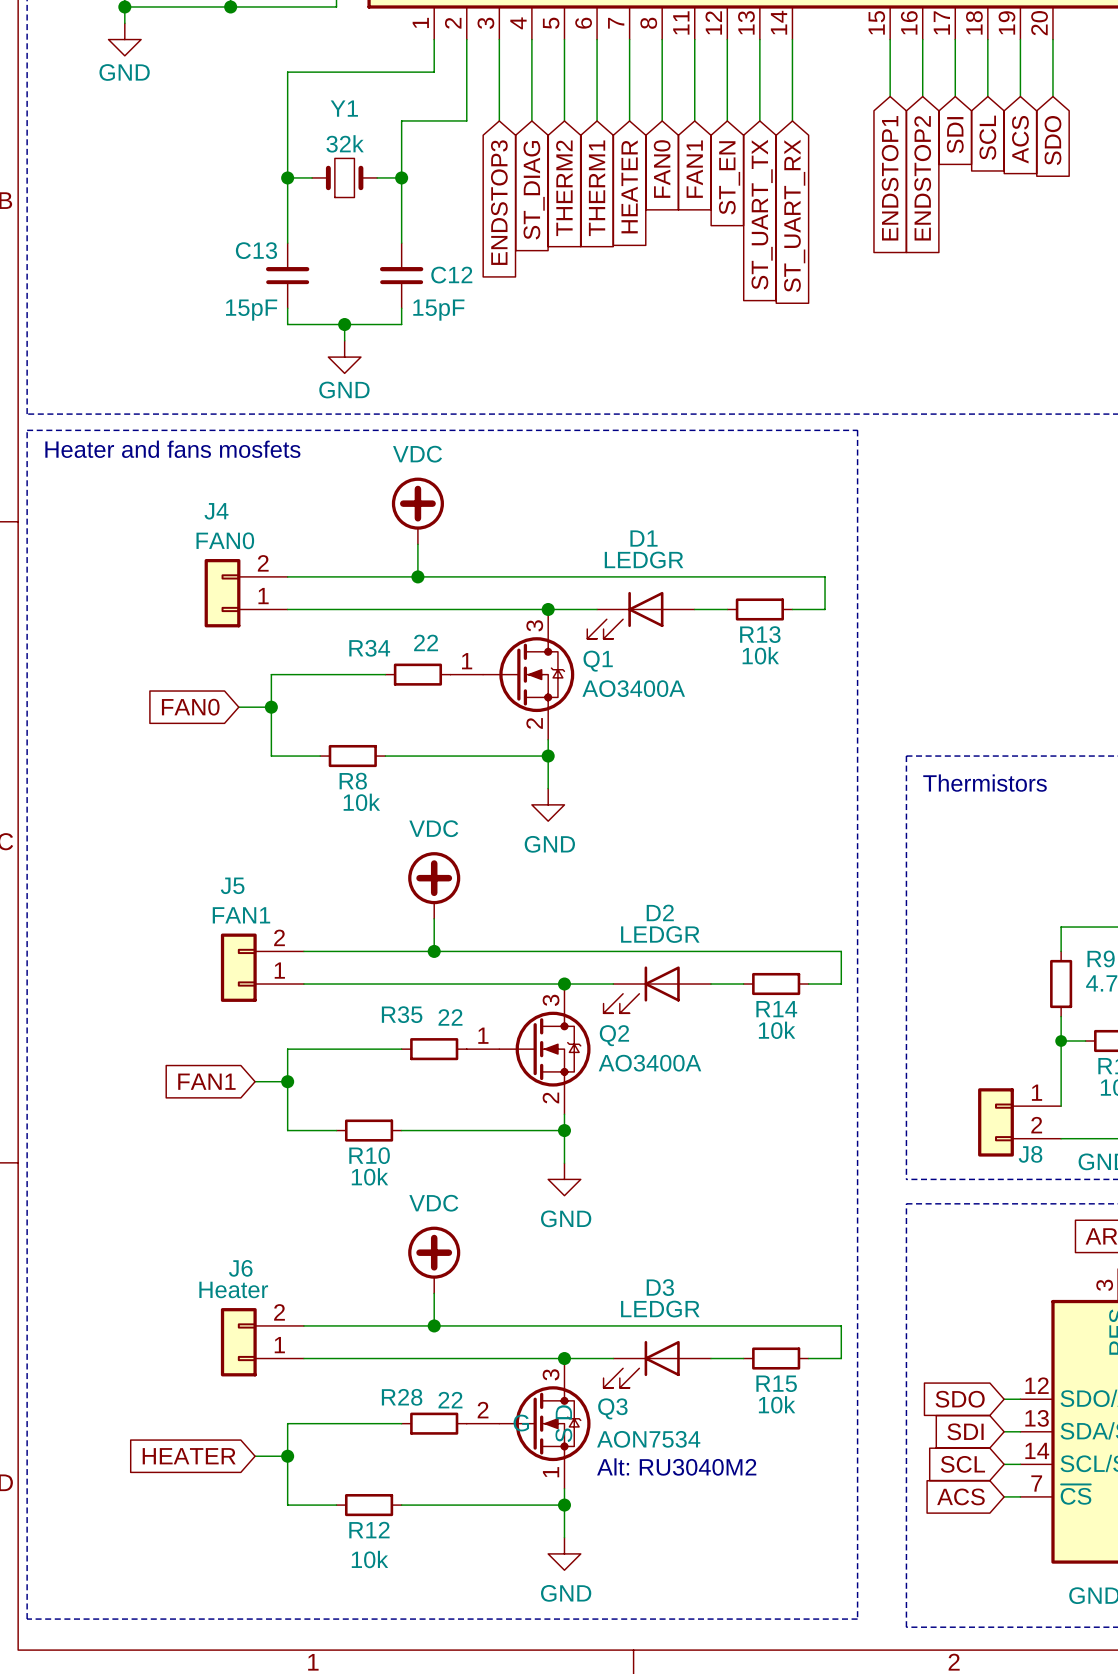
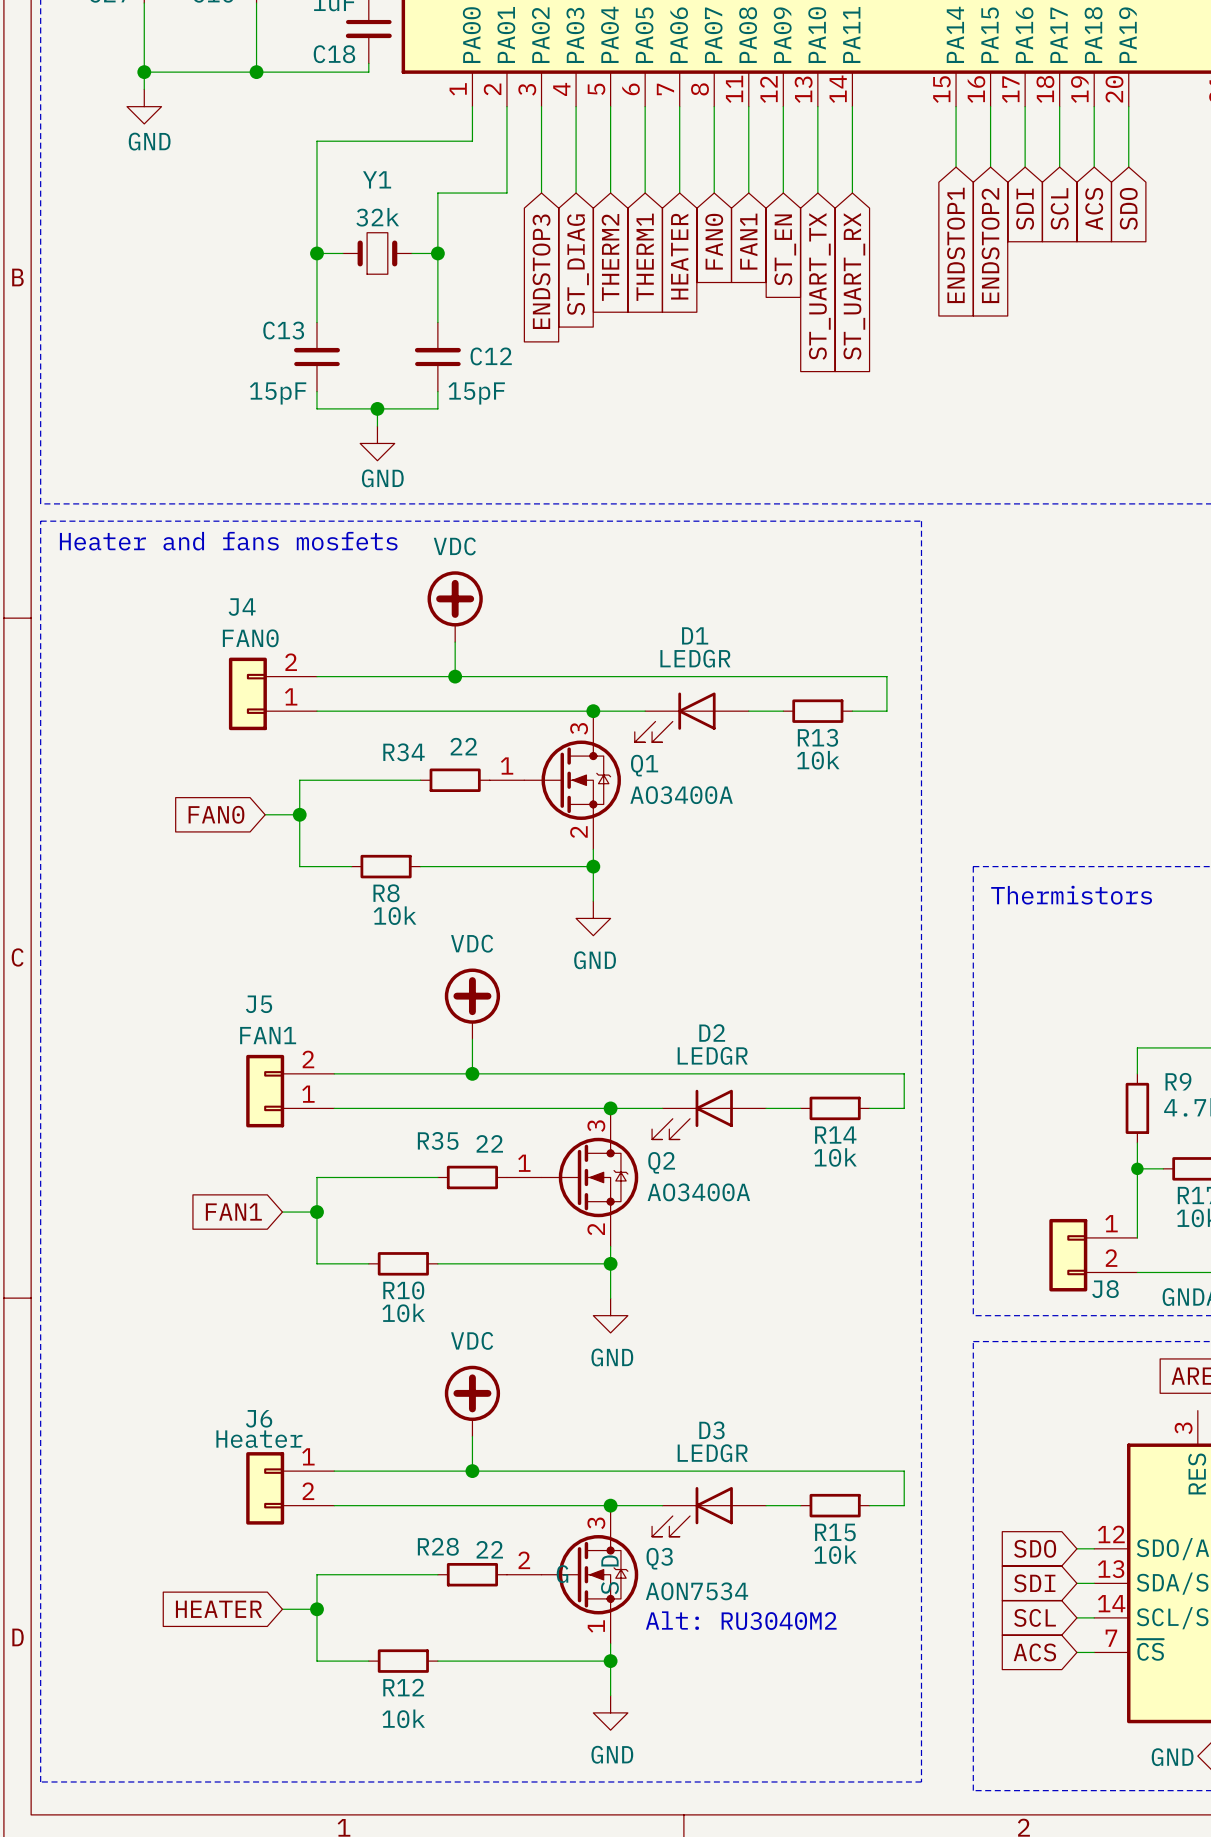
J6 flip: as is (238, 1342) -> up-down (265, 1488)

